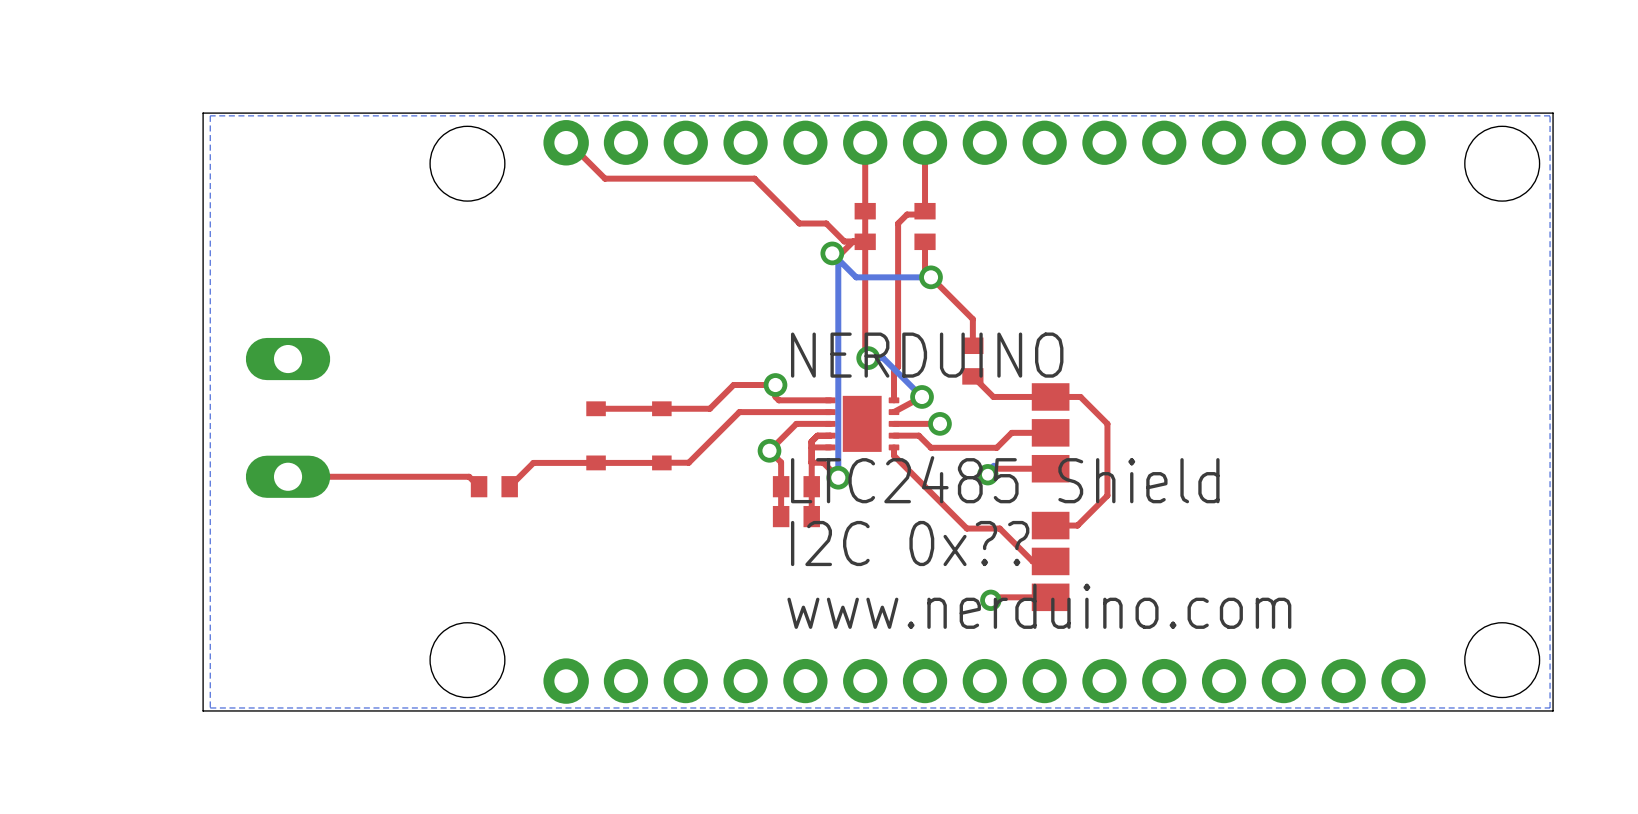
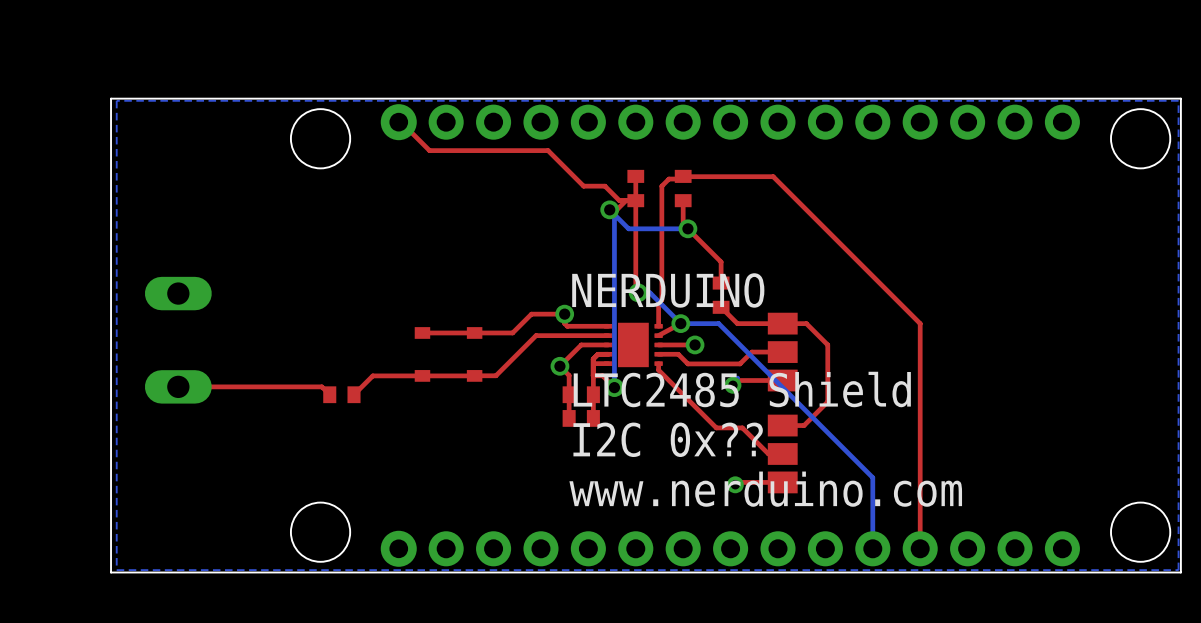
top track: (865, 142) (865, 211) -> none
top track: (925, 142) (925, 211) -> (920, 548) (920, 323) (773, 176) (683, 176)
bottom track: none -> (680, 323) (718, 323) (872, 477) (872, 548)

